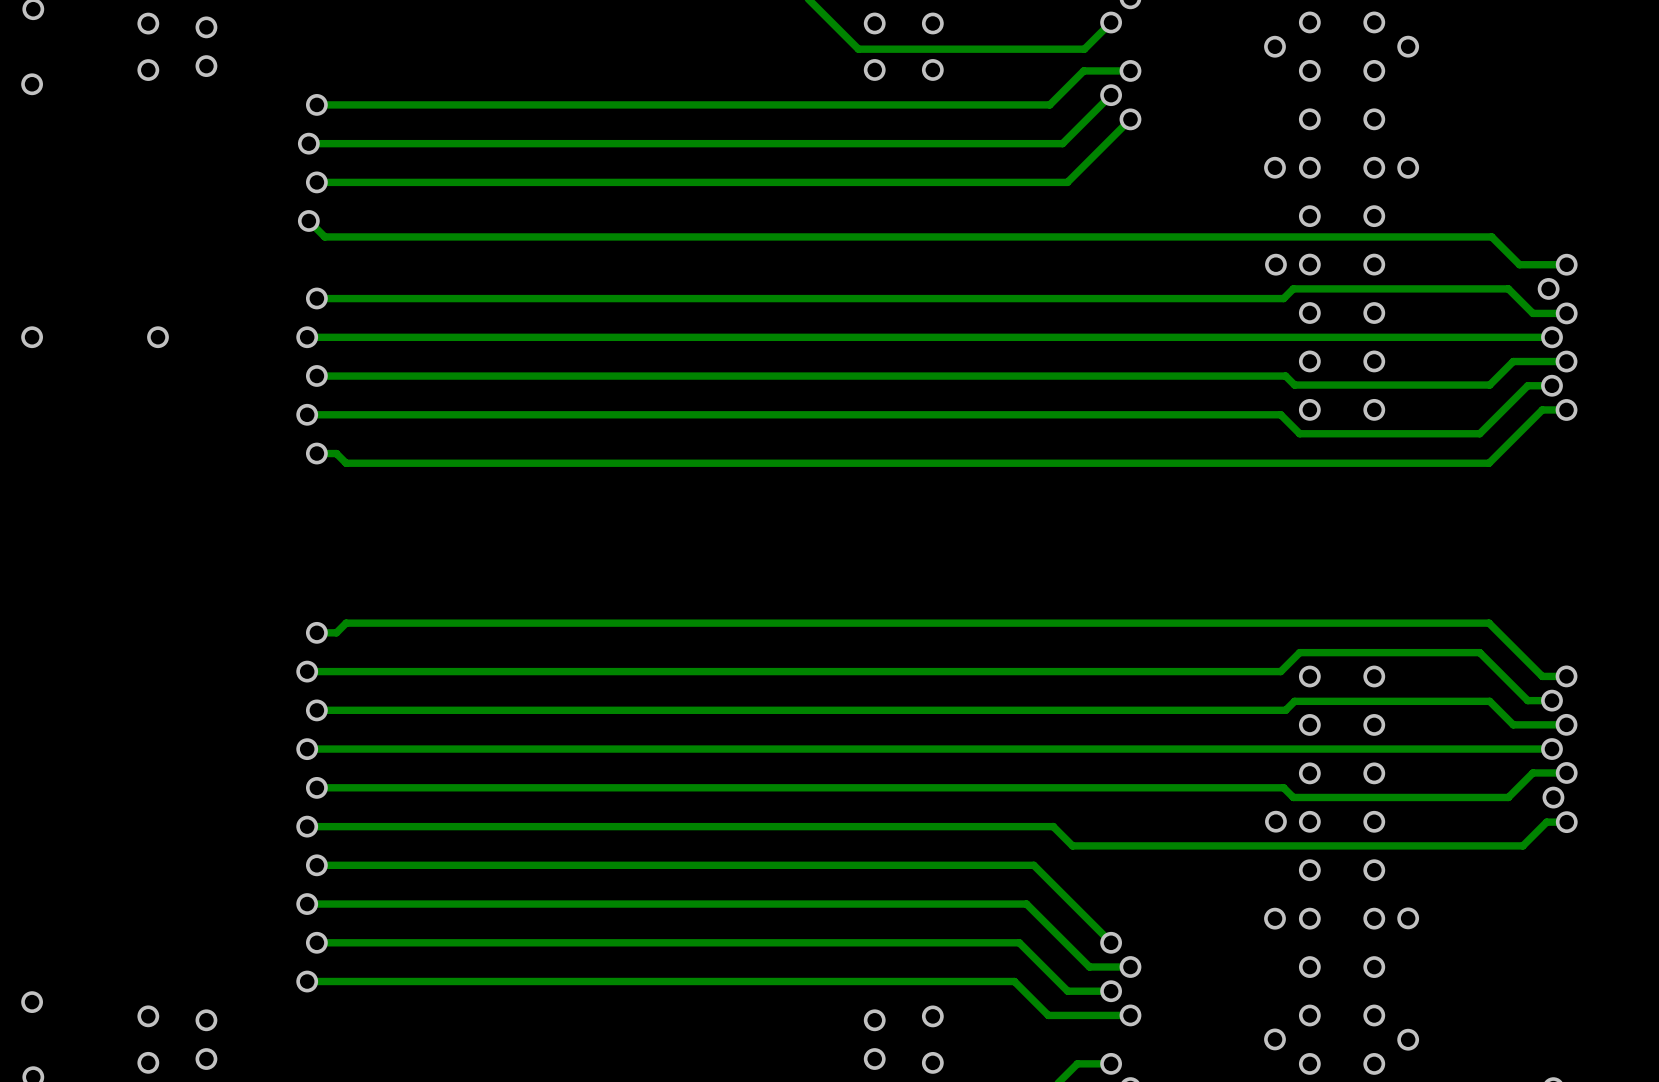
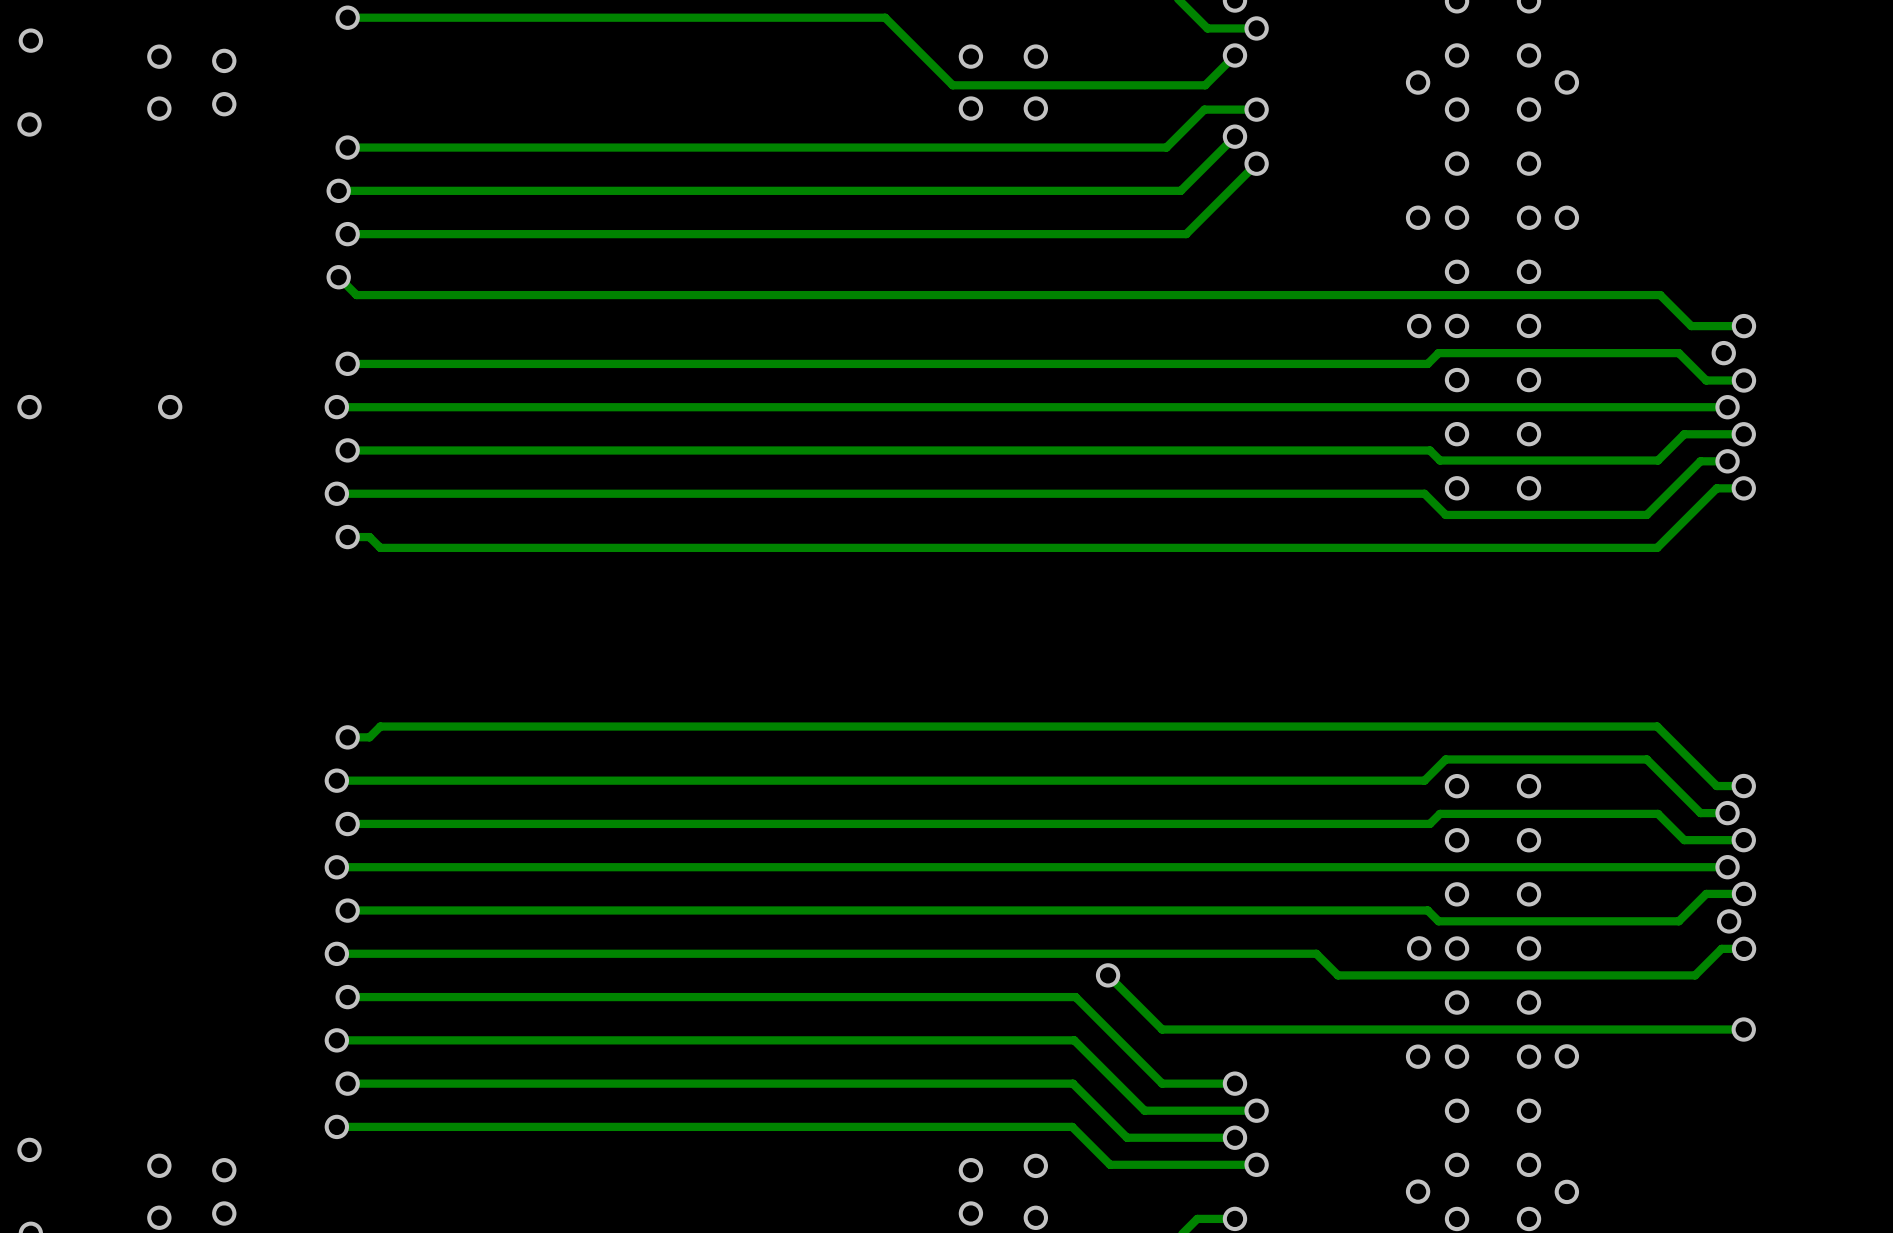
track: (1053, 826) (307, 826) -> (1338, 975) (1316, 953) (336, 953)
track: (1053, 826) (1072, 845) (1203, 845) -> none
track: none -> (1108, 975) (1162, 1029) (1743, 1029)
via: none -> (1108, 975)
track: (968, 865) (1033, 865) (1111, 942) -> (1075, 997) (1162, 1083) (1234, 1083)
via: none -> (1743, 1029)
track: (967, 904) (1026, 904) (1089, 967) -> (1074, 1040) (1144, 1110) (1210, 1110)
track: (966, 942) (1019, 942) (1067, 991) -> (1072, 1083) (1127, 1137) (1186, 1137)
track: (965, 981) (1014, 981) (1048, 1015) -> (1072, 1126) (1110, 1164) (1164, 1164)

